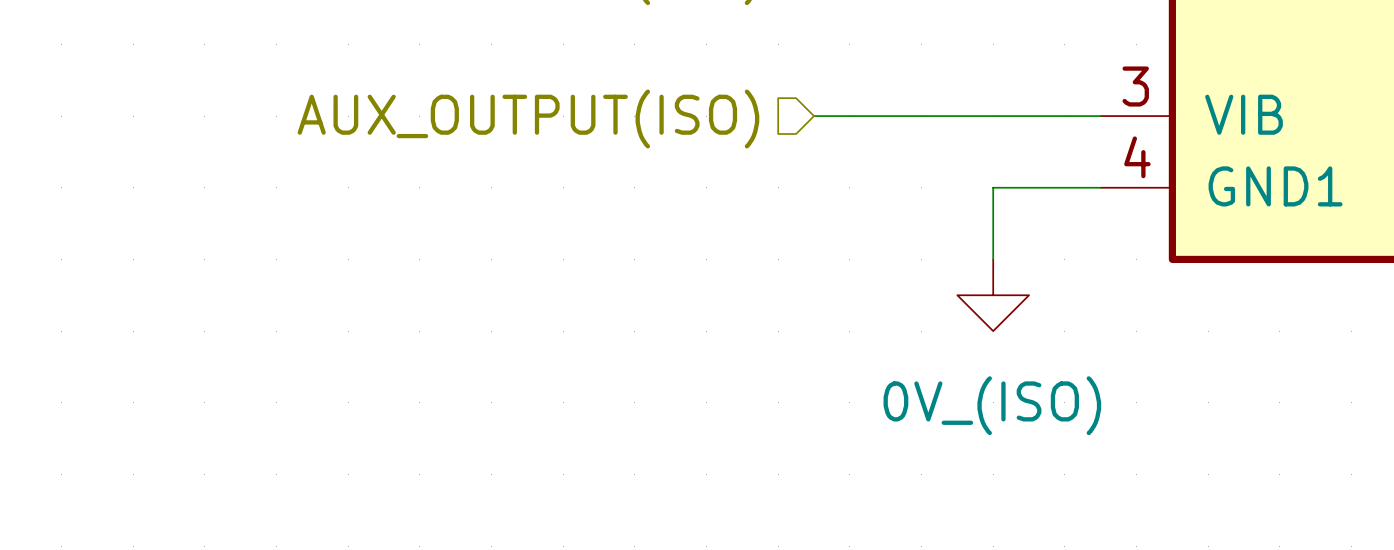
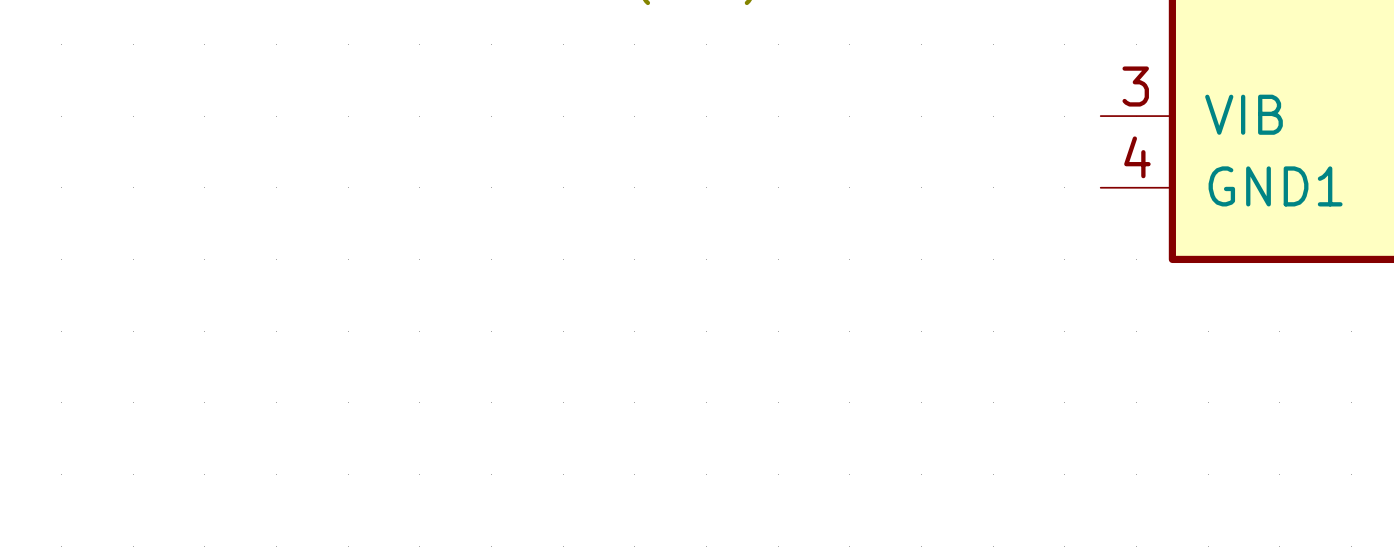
wire: (814, 116) (1100, 116) -> none
hierarchical label: AUX_OUTPUT(ISO) (528, 119) -> none
wire: (1100, 187) (993, 187) (993, 259) -> none
power symbol: 0V_(ISO) (993, 295) -> none

